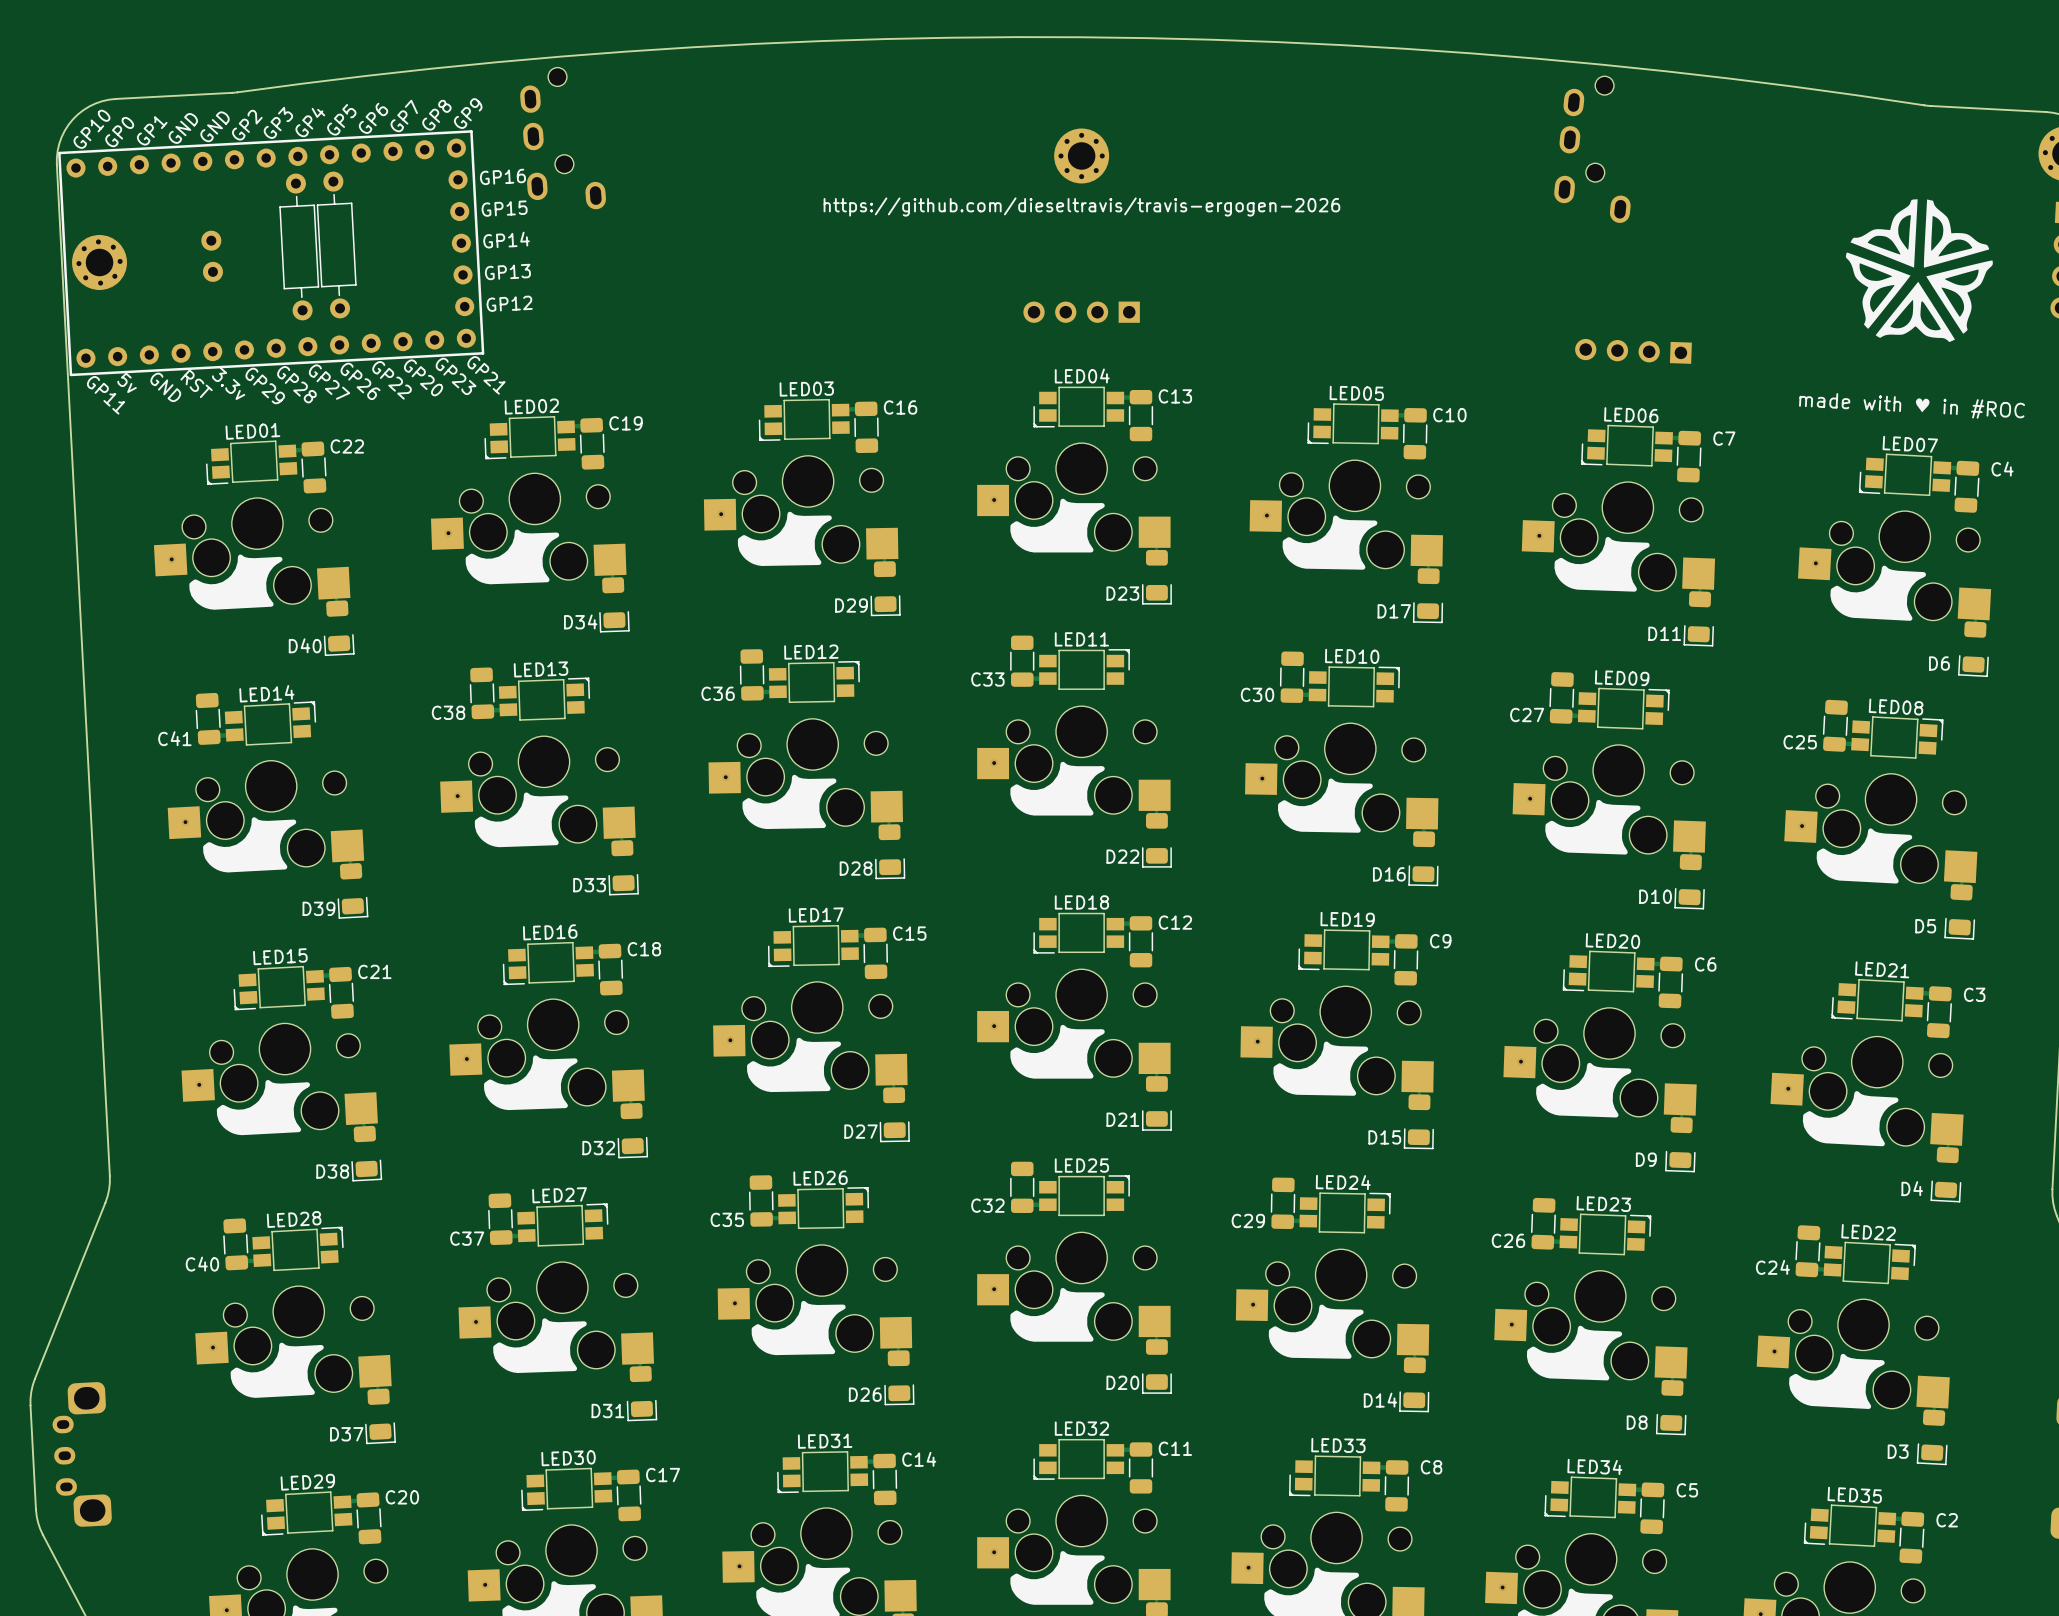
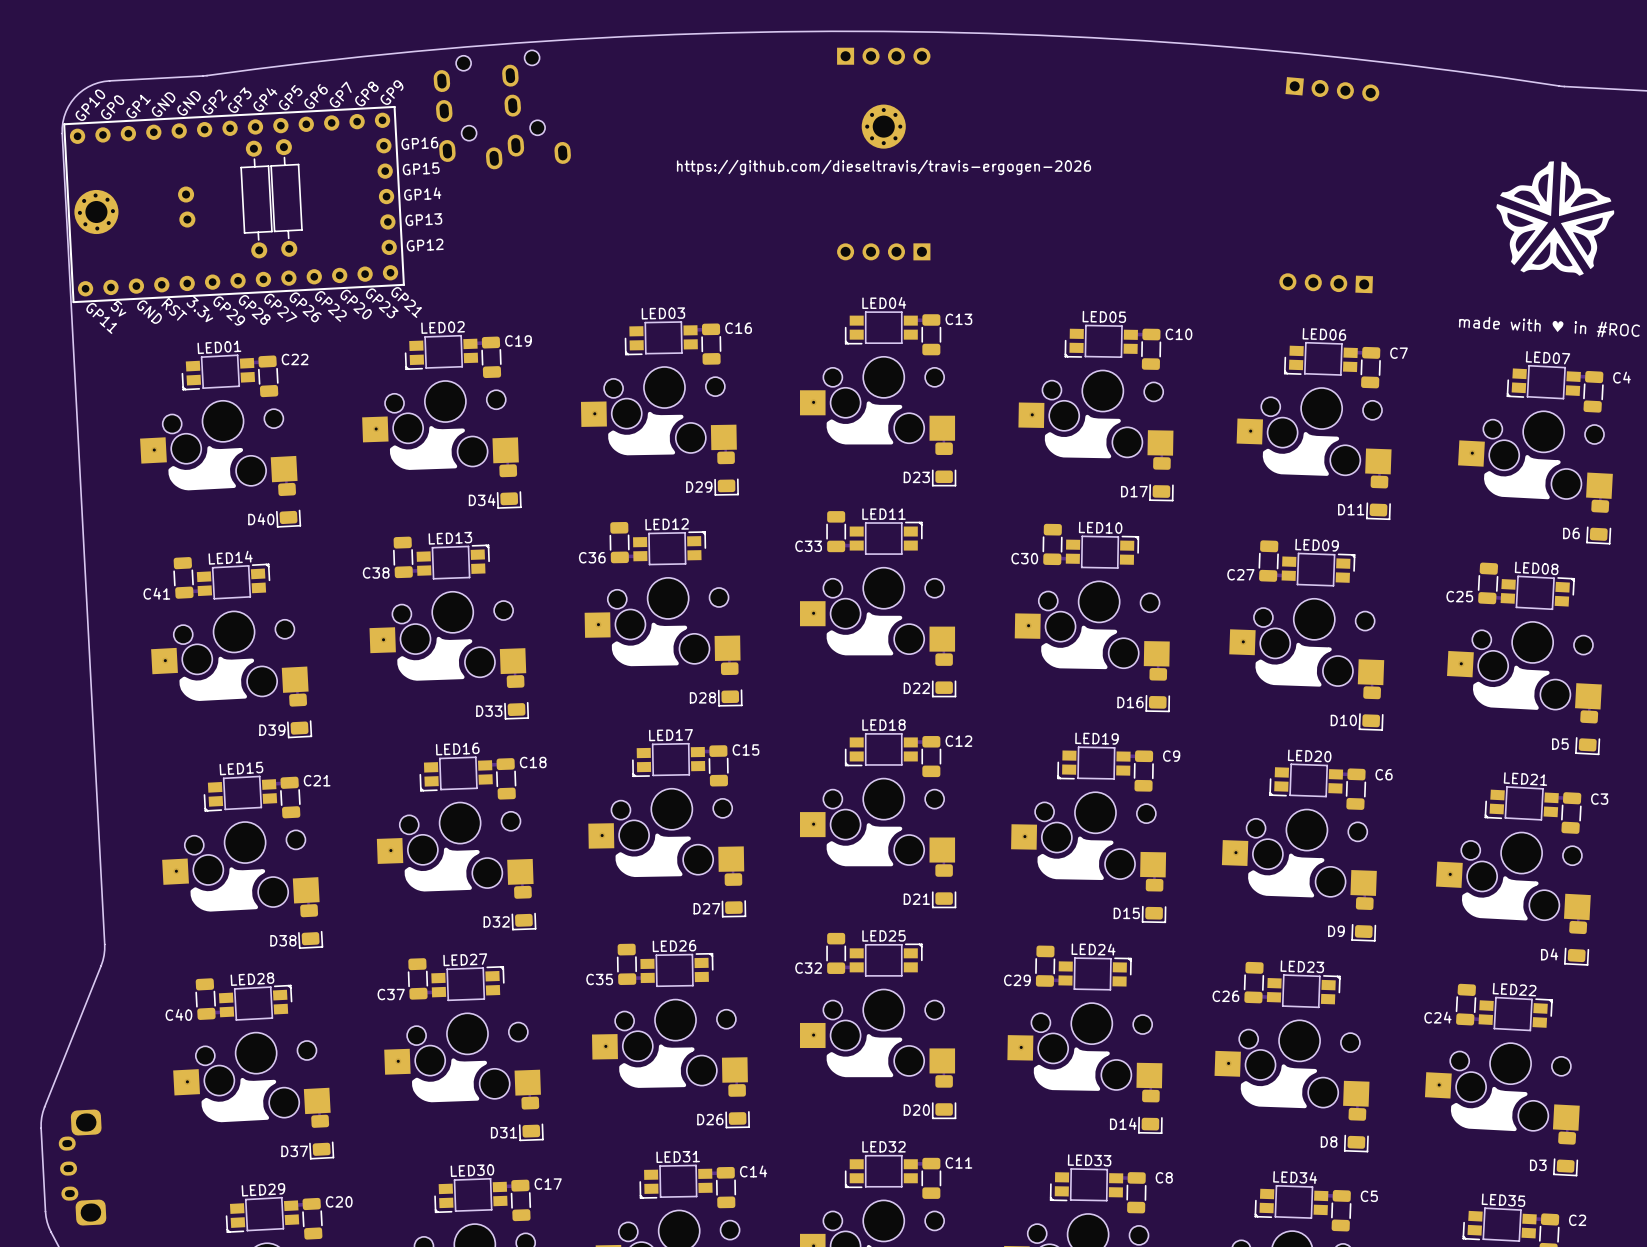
part: none -> (883, 56)
part: none -> (1332, 89)
part: none -> (536, 107)
part: (1592, 149) -> none

